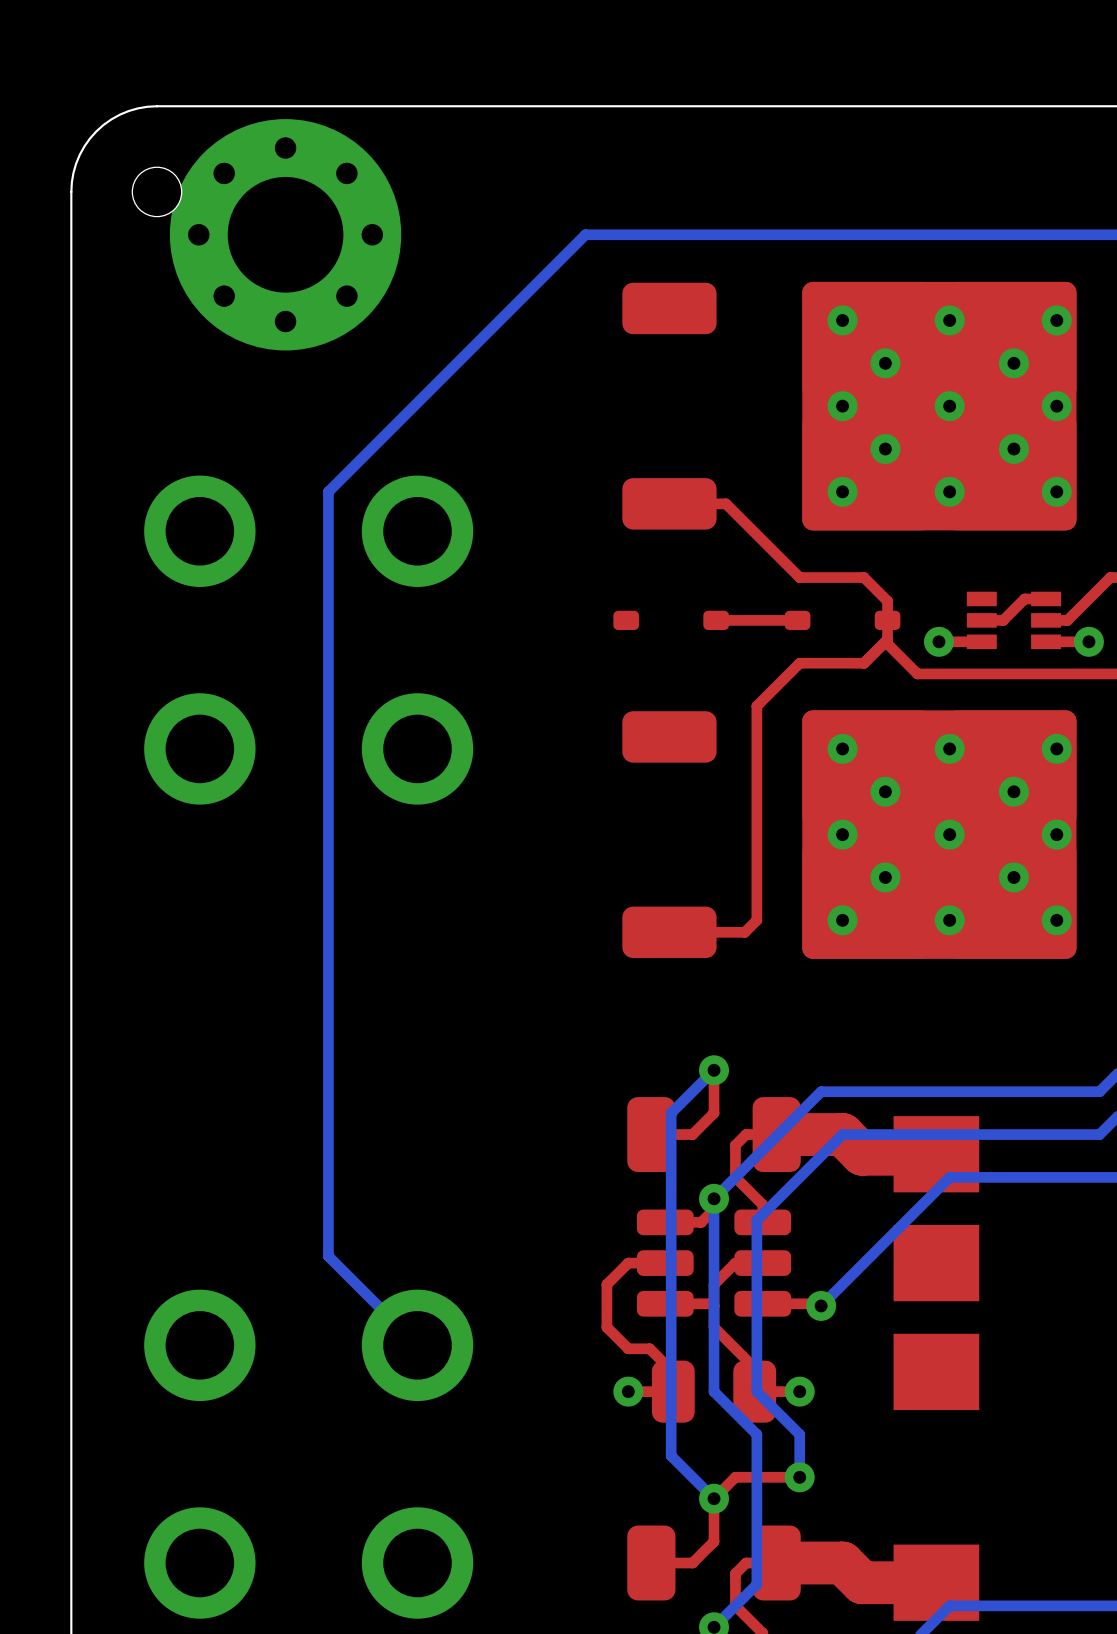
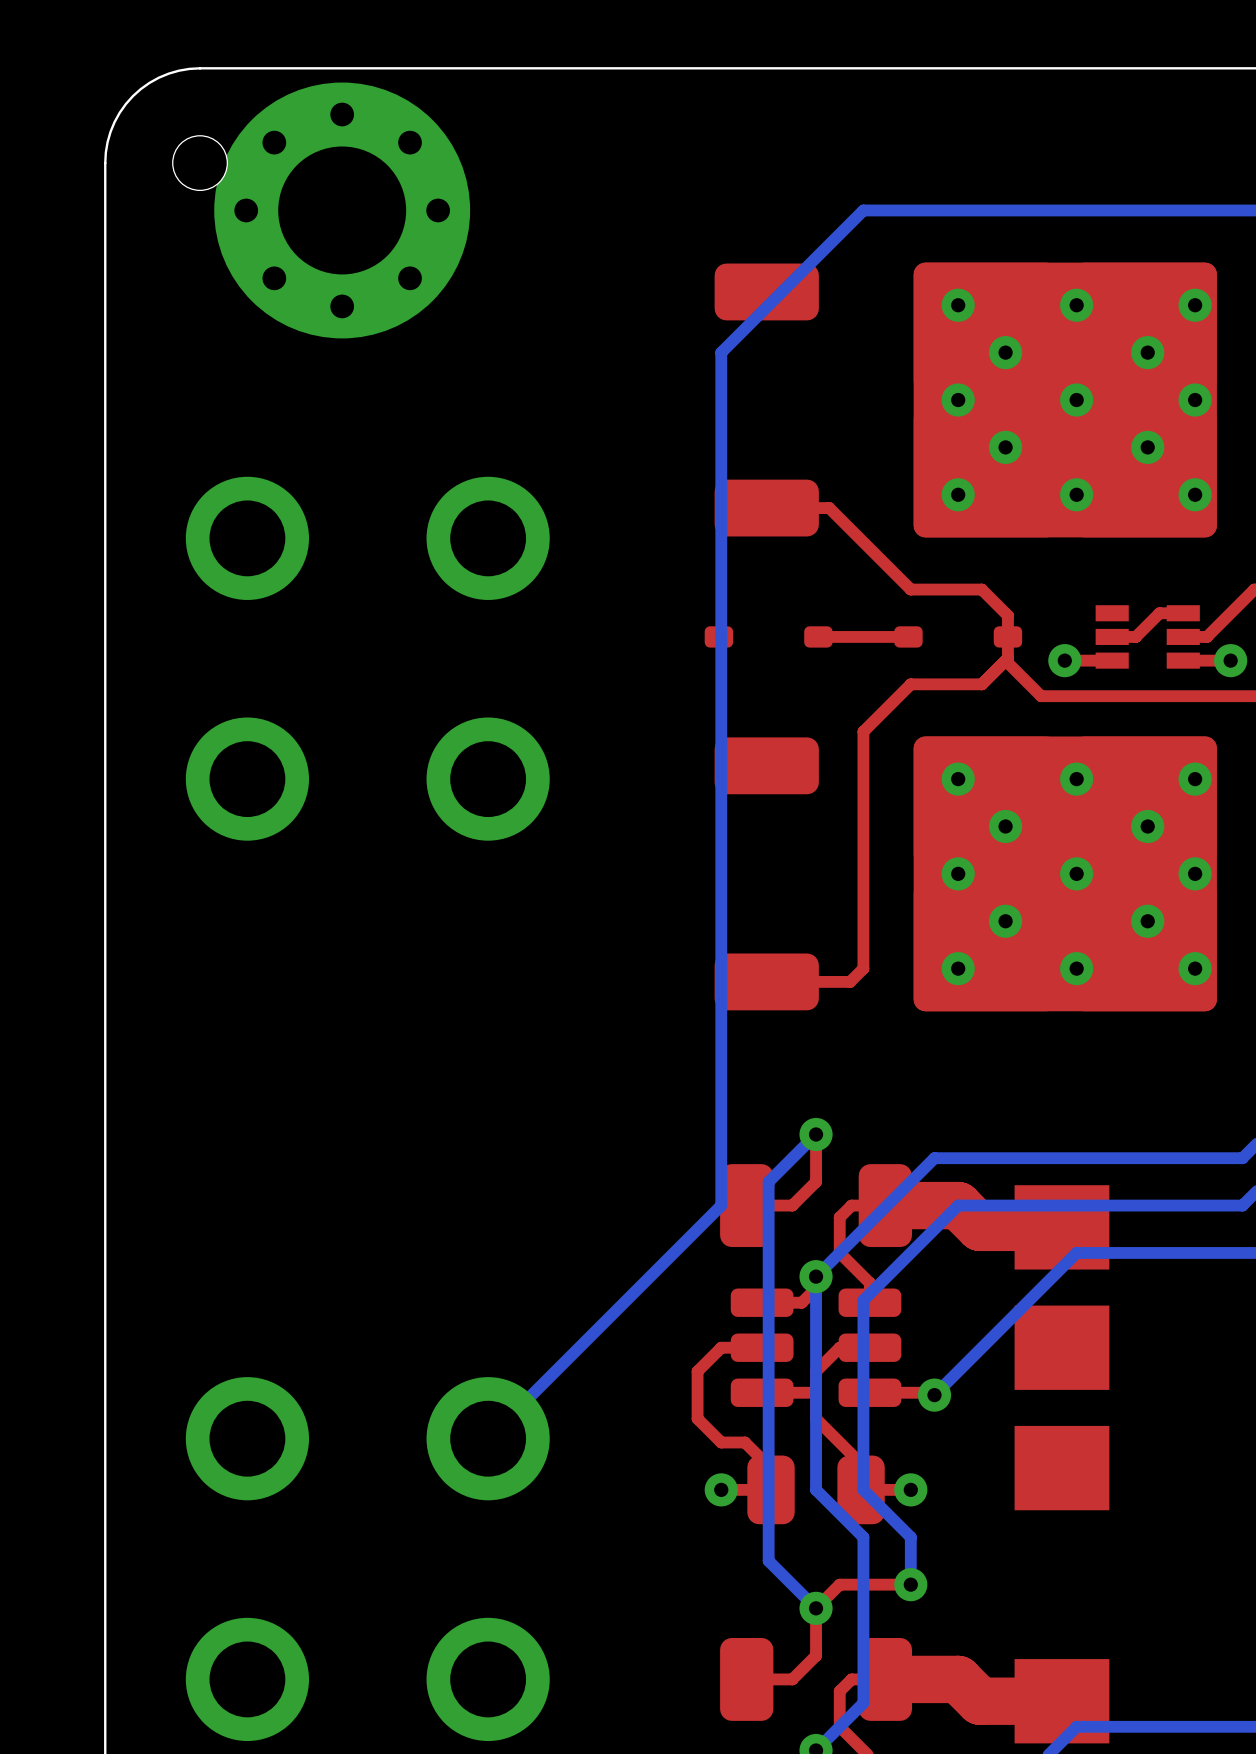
bottom track: (756, 234) (585, 234) (328, 491) (328, 1256) (417, 1345) -> (863, 210) (721, 352) (721, 1205) (488, 1438)

